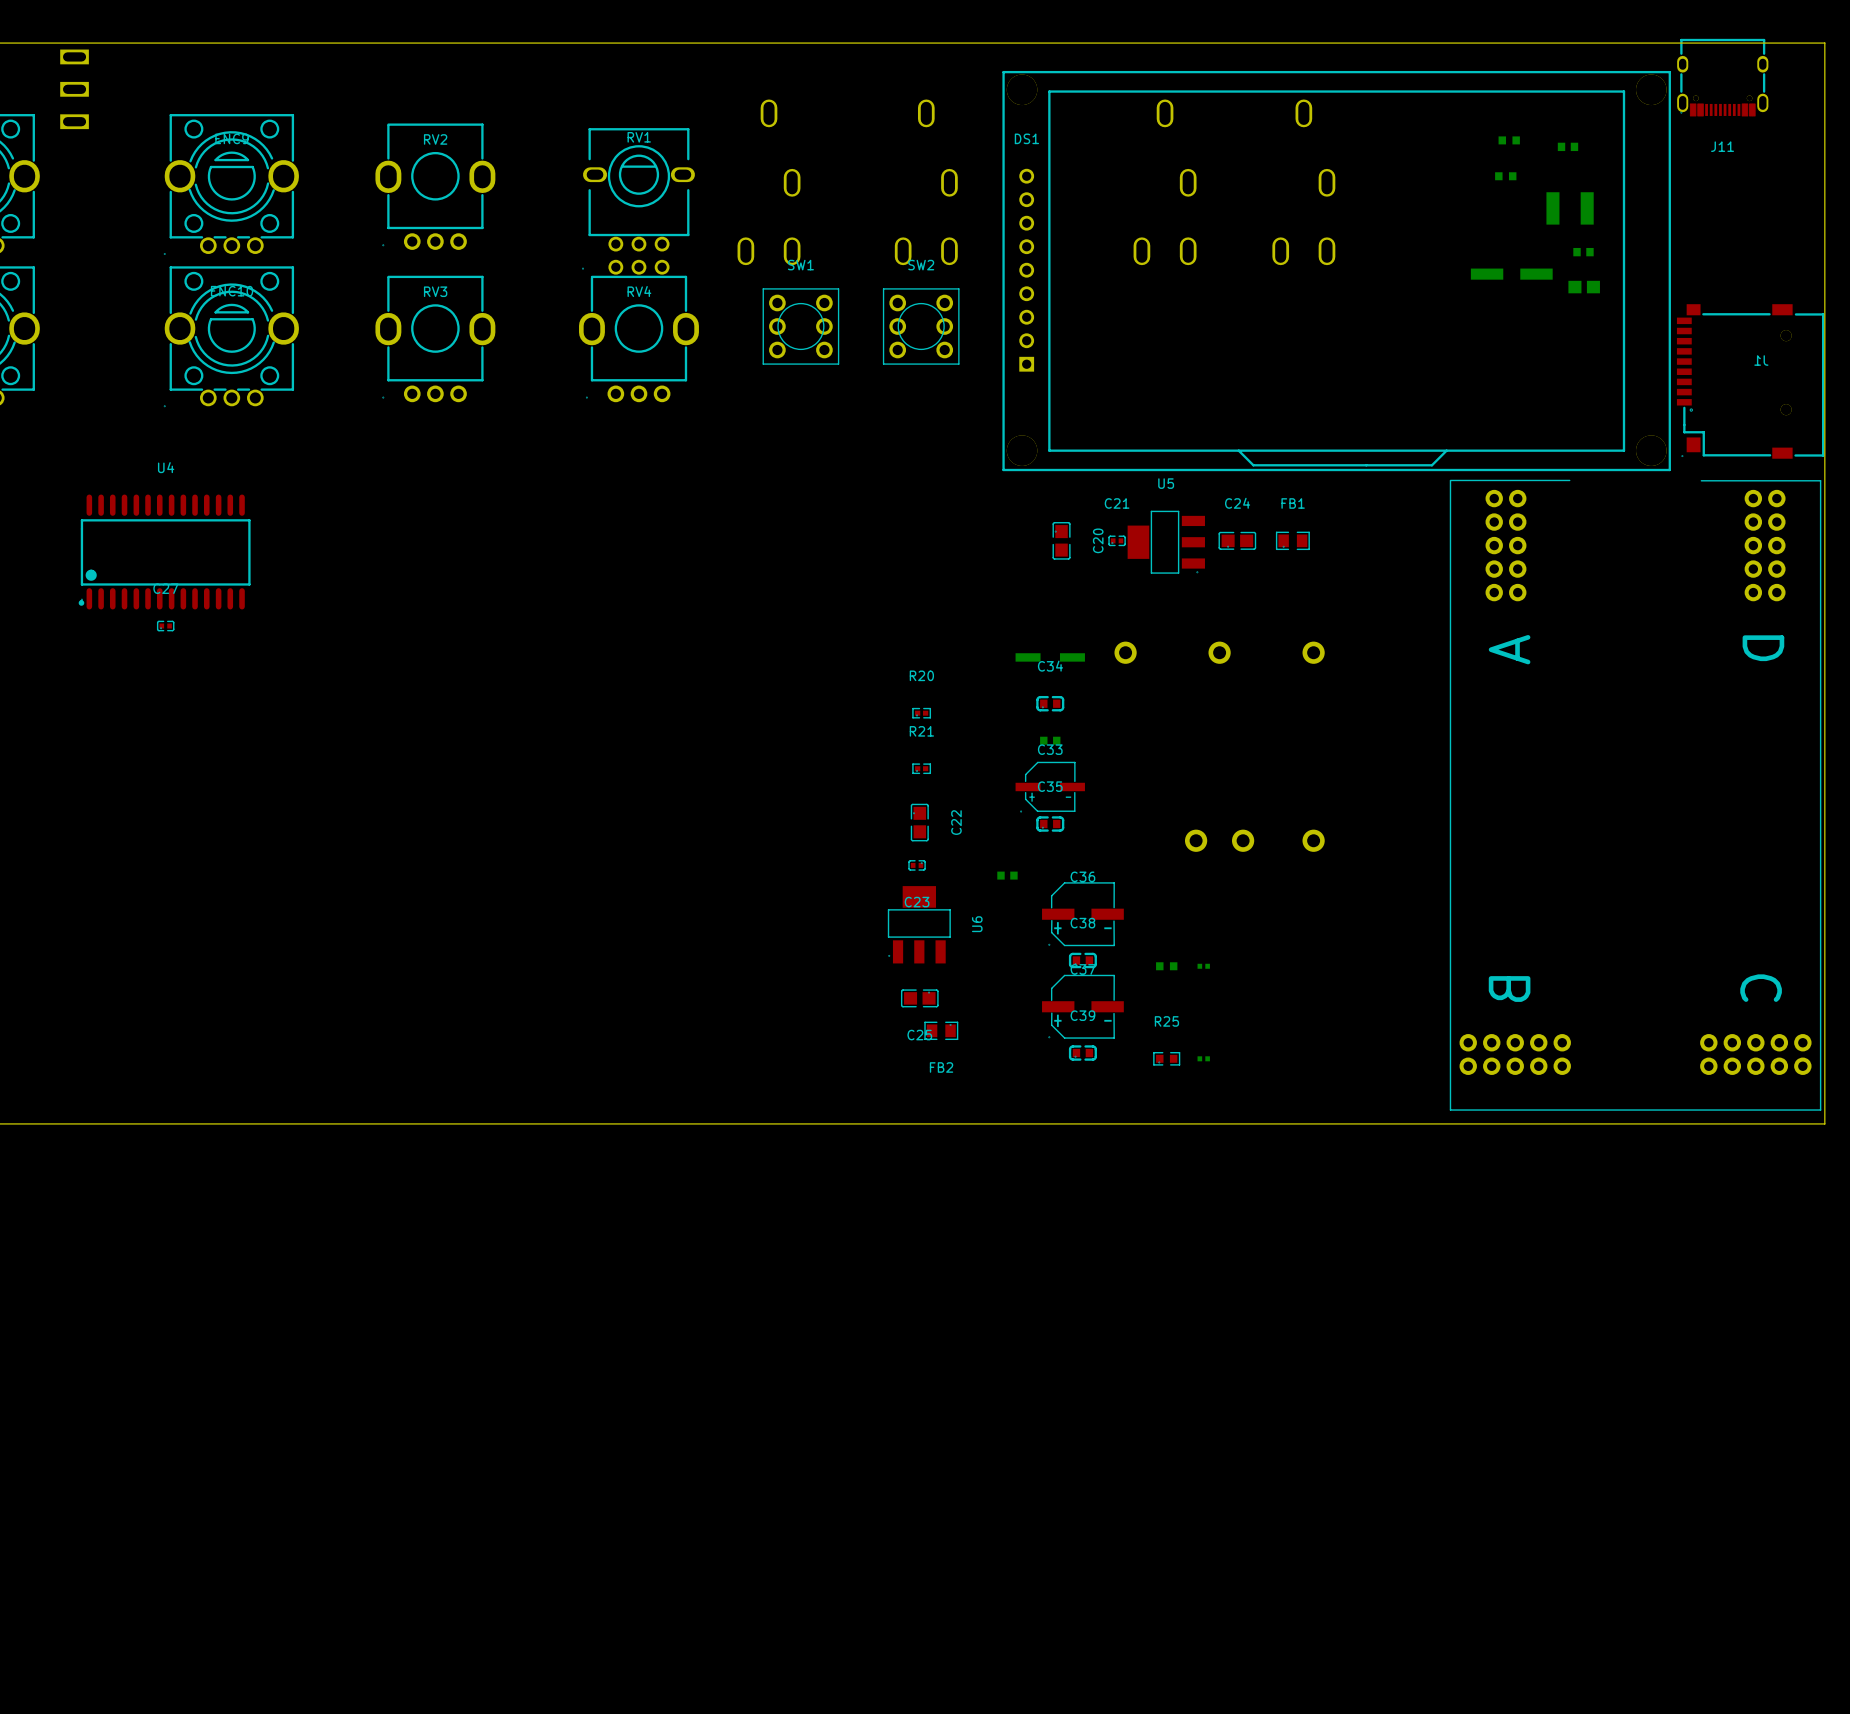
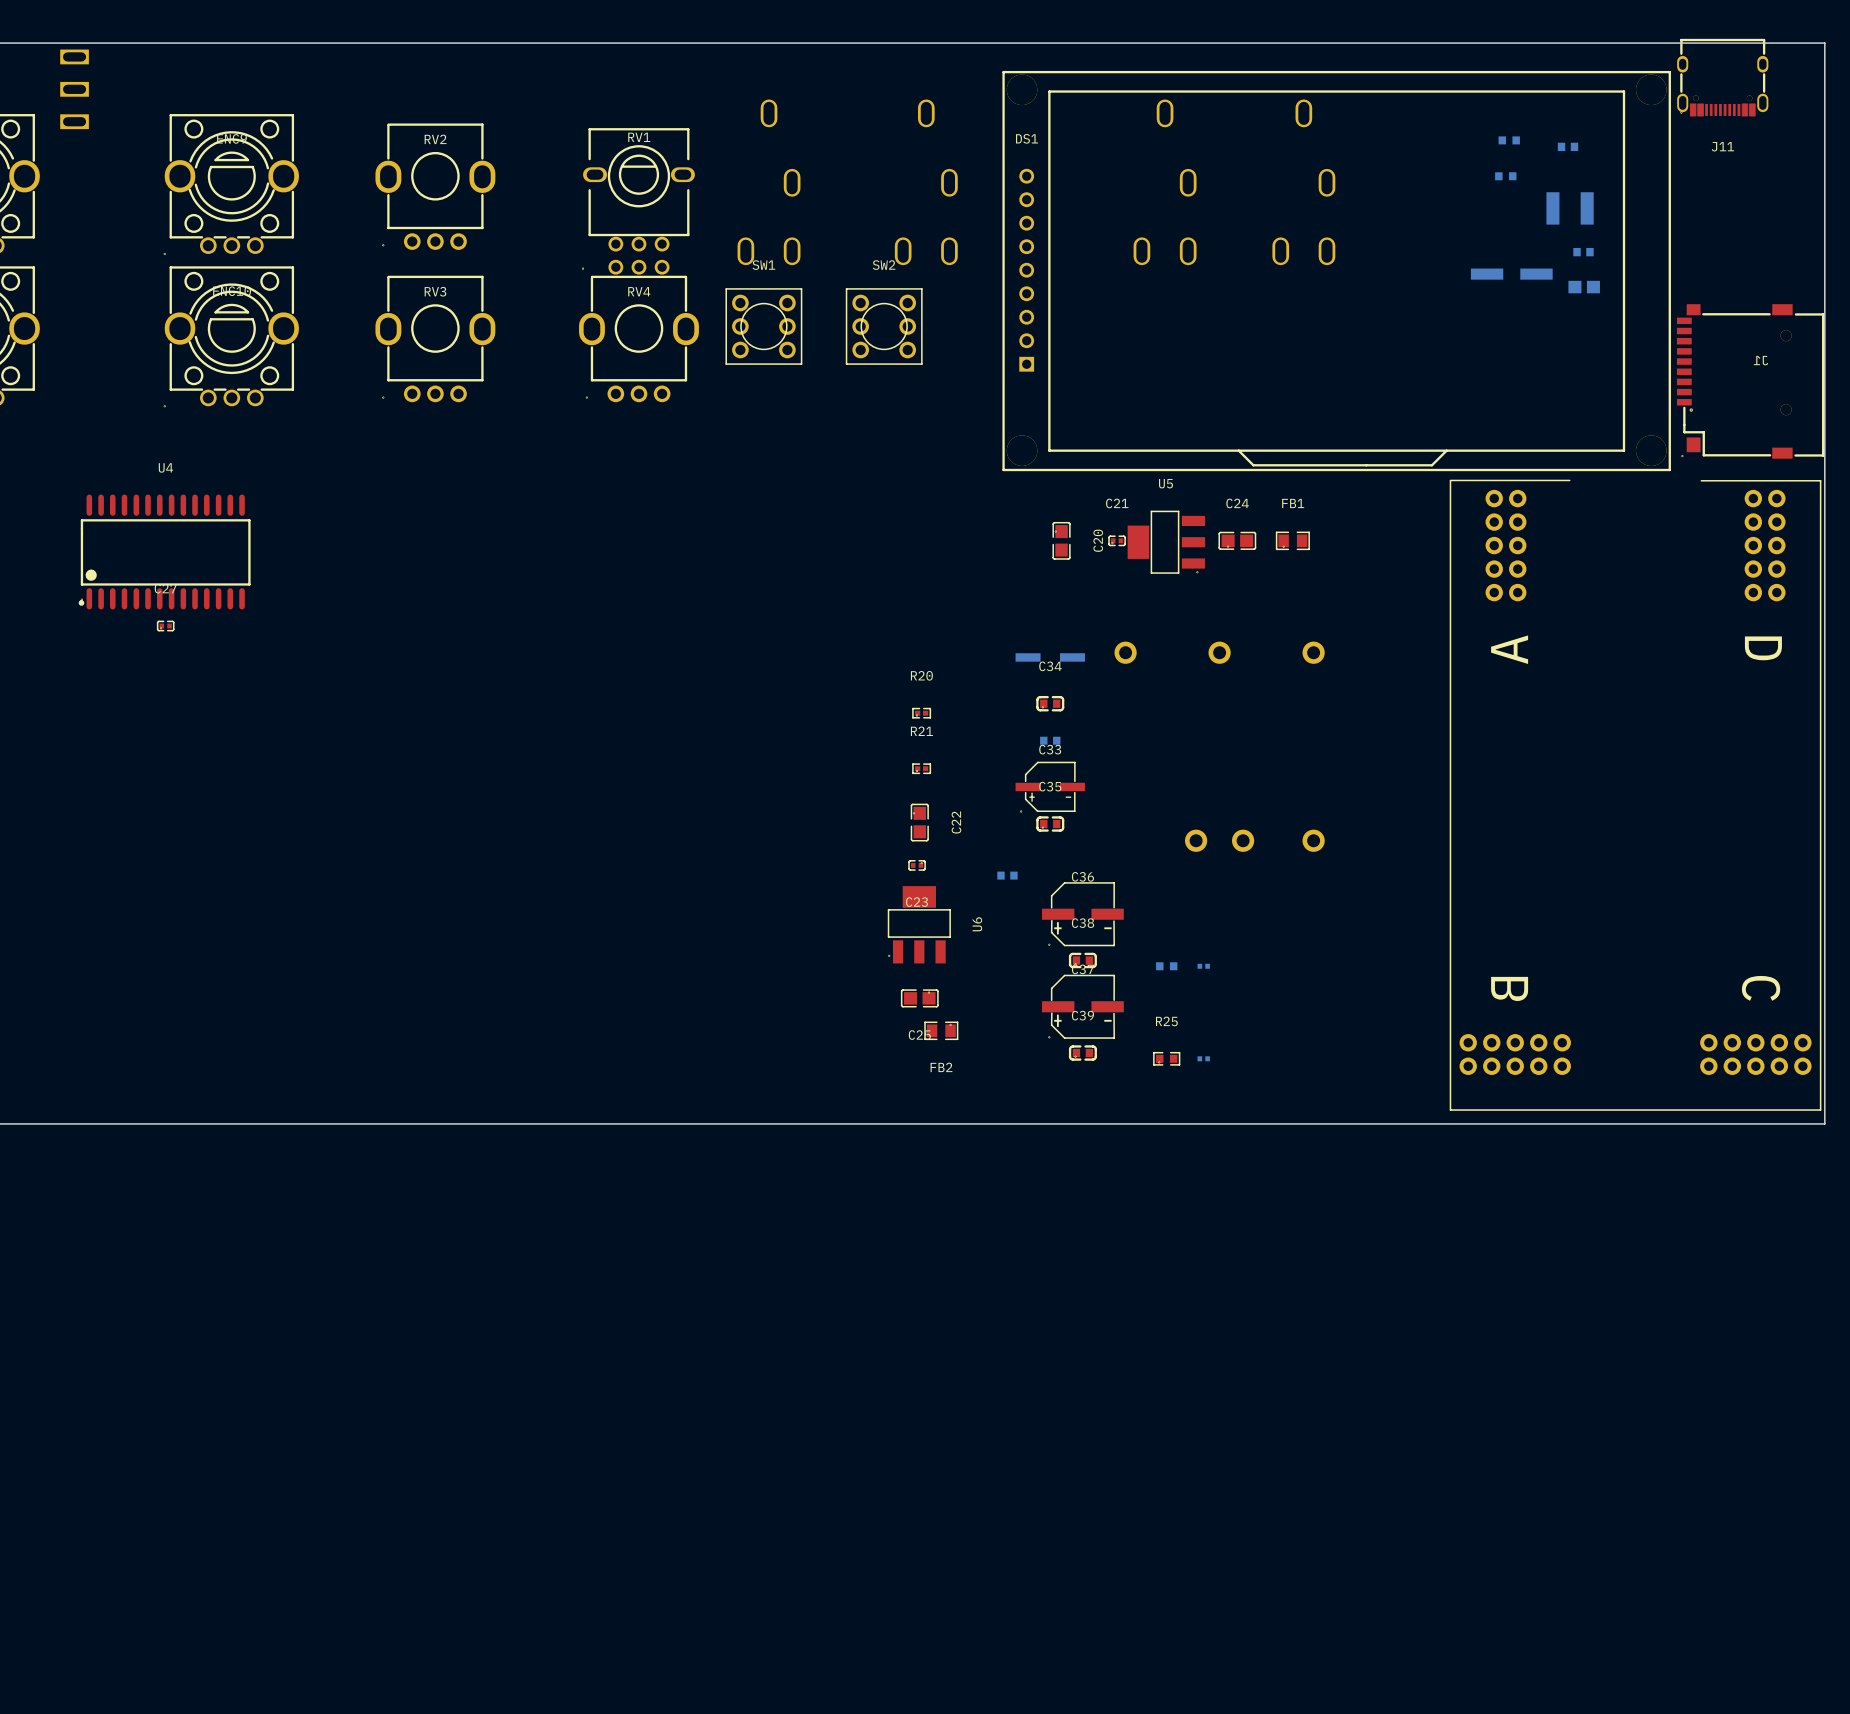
SW1 position: (800, 326) -> (763, 326)
SW2 position: (921, 326) -> (884, 326)

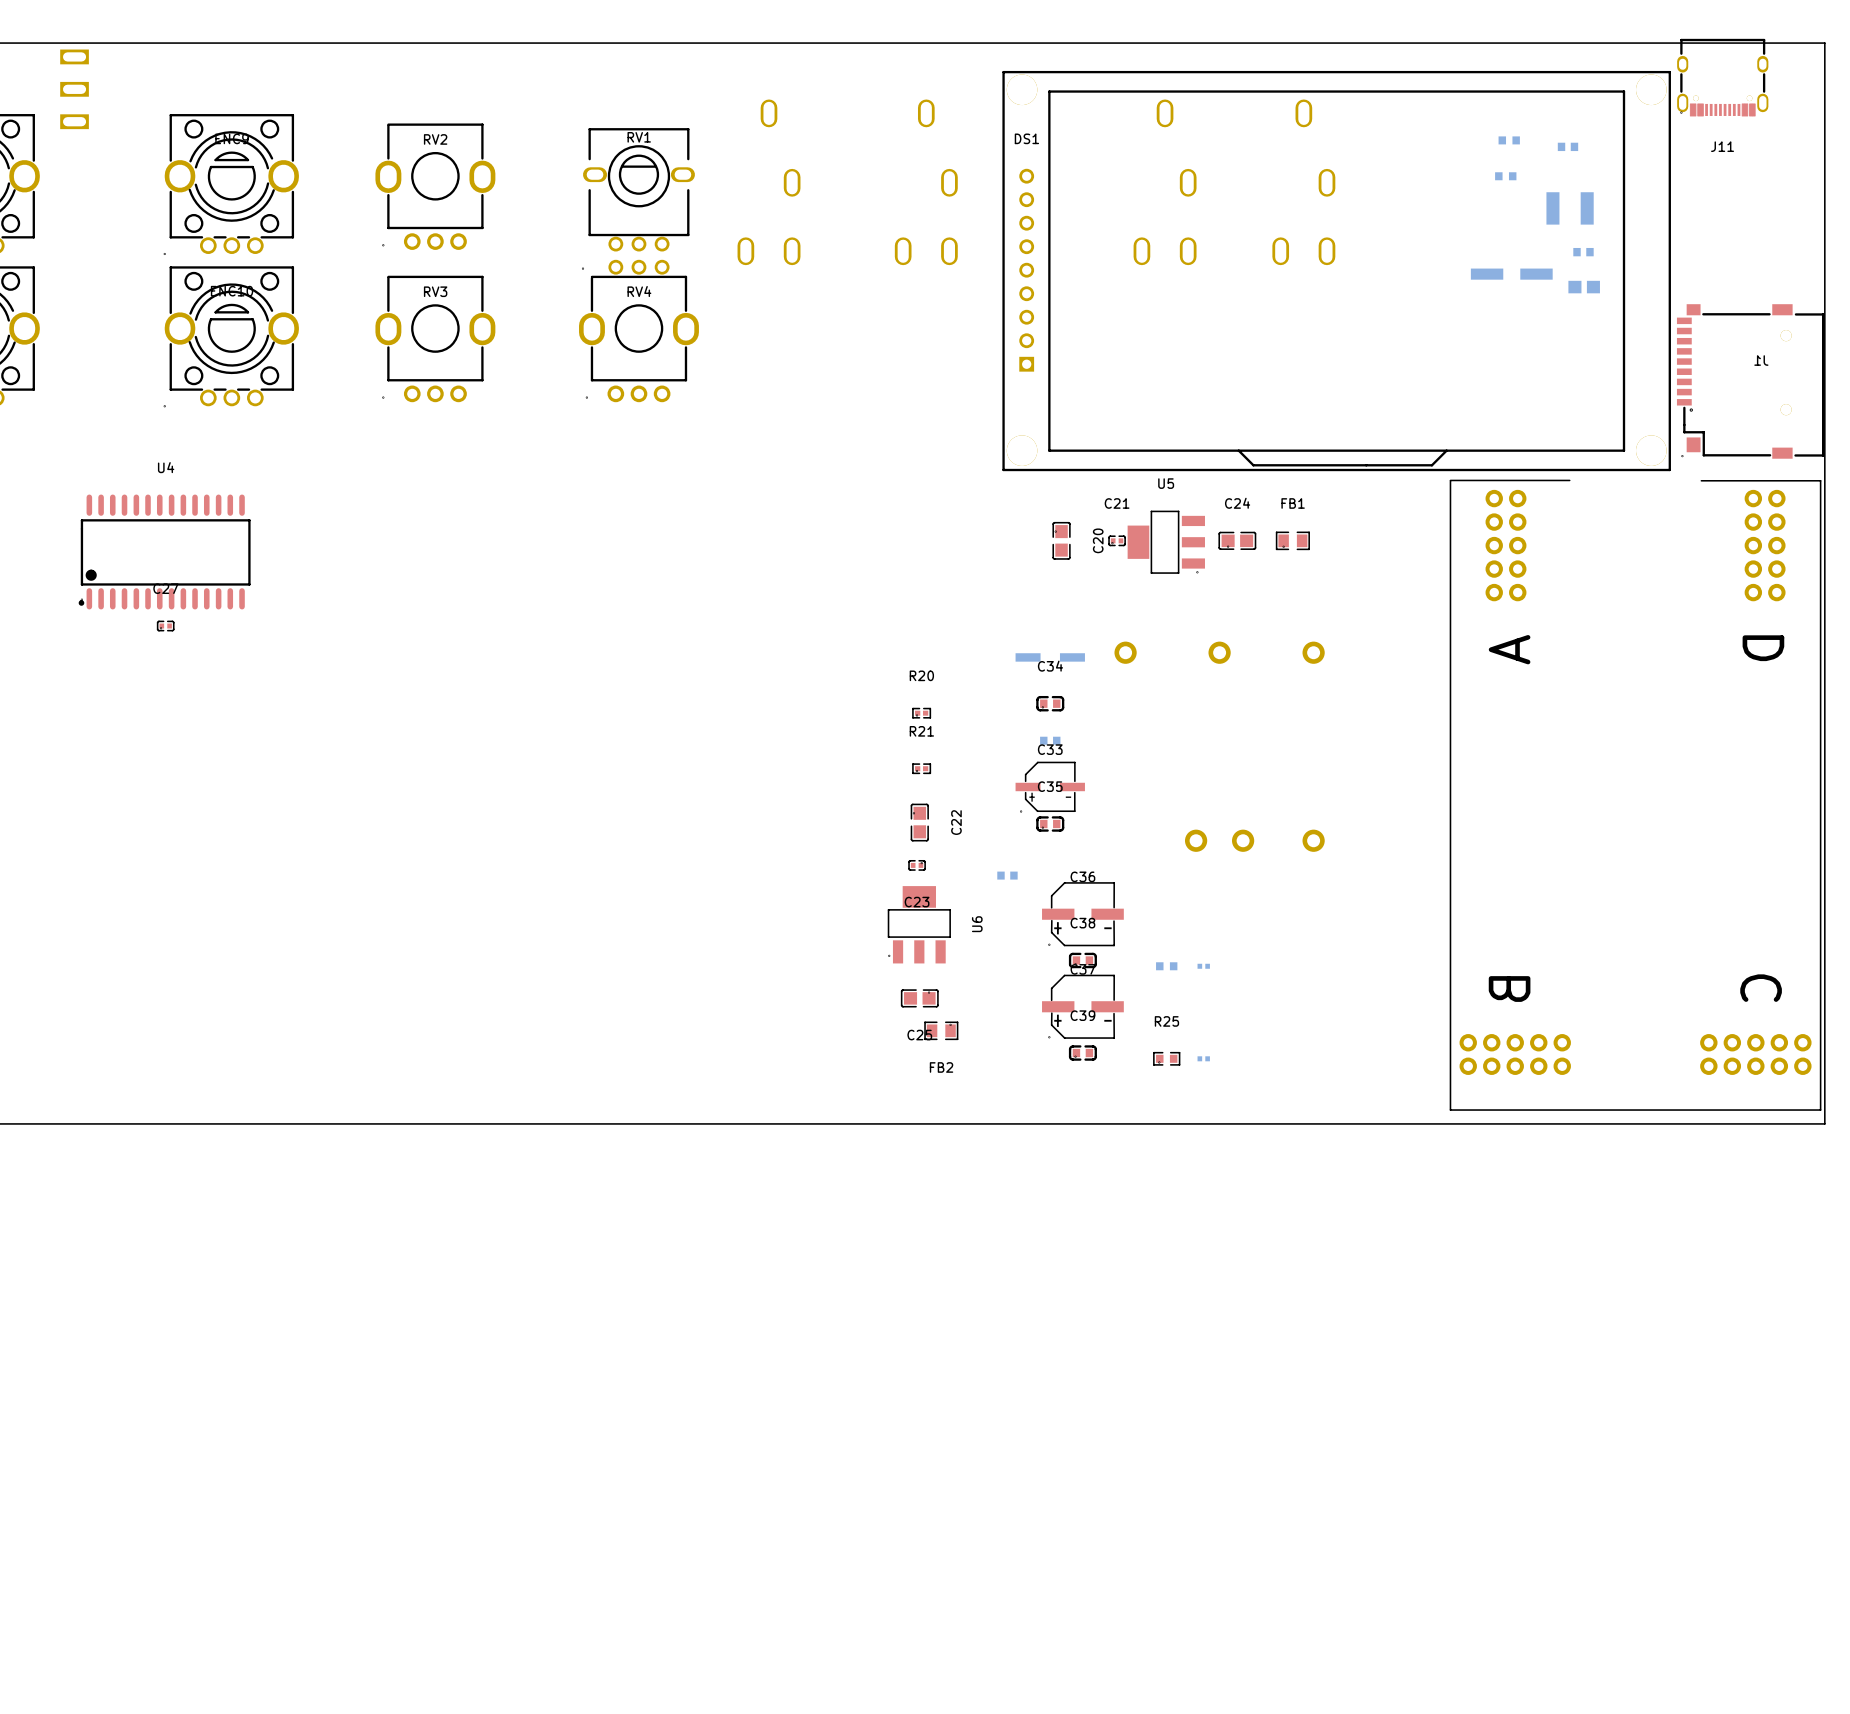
SW1: (763, 326) -> none
SW2: (884, 326) -> none

